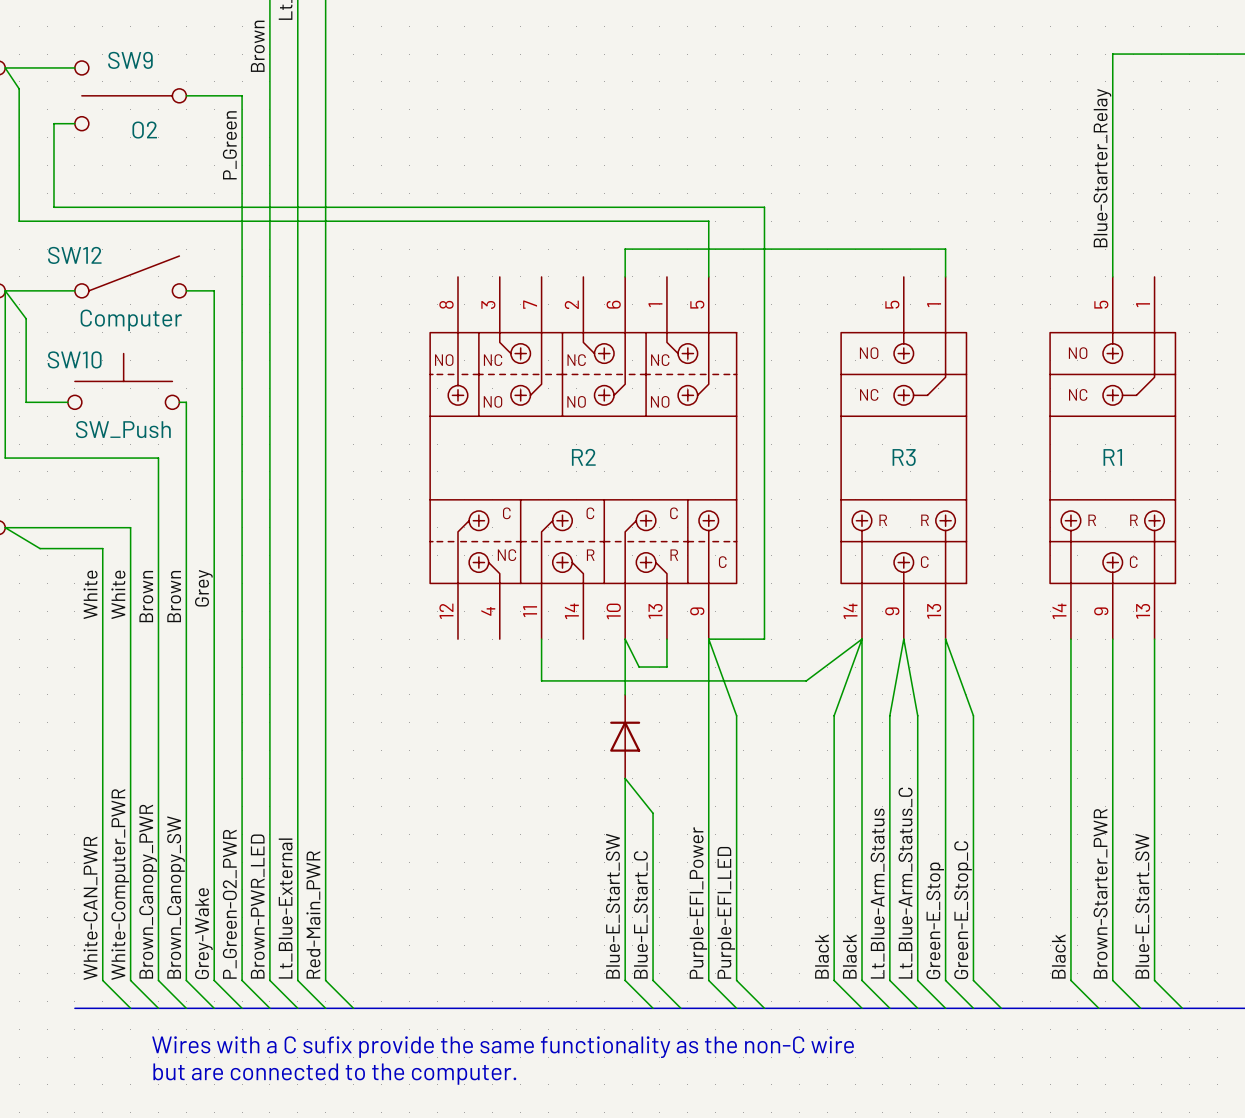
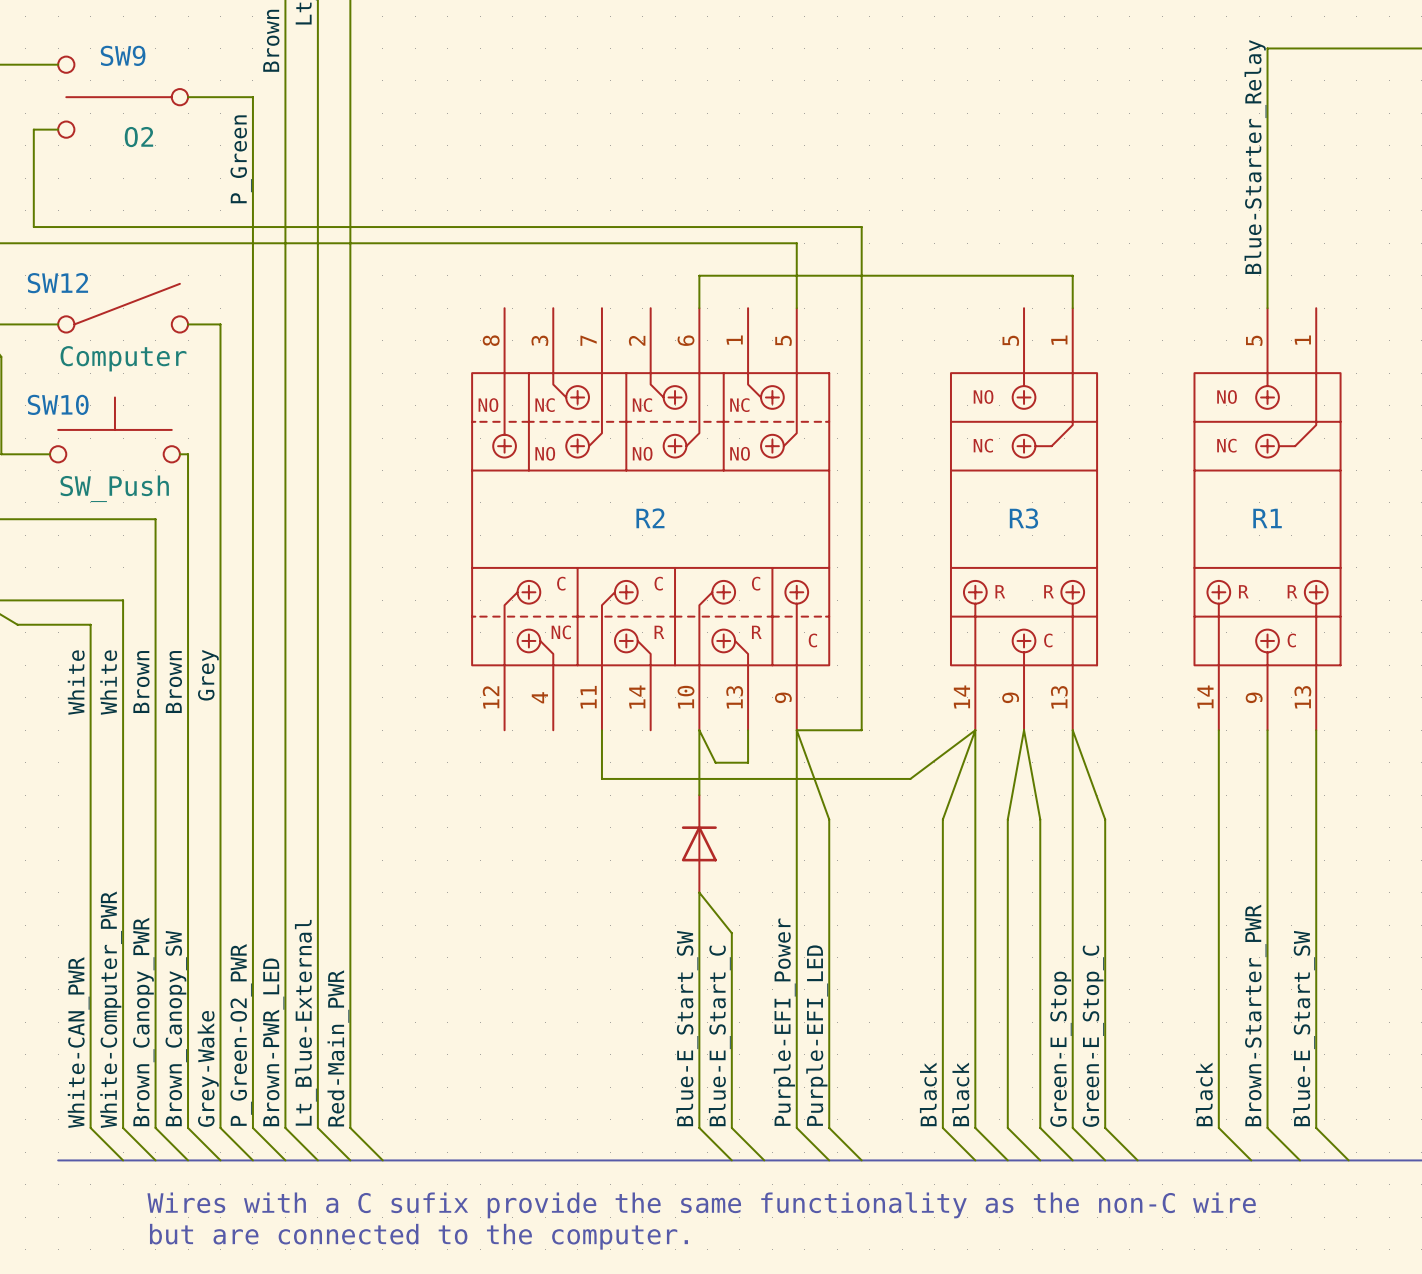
label: Lt_Blue-Arm_Status_C (905, 883) -> none
label: Lt_Blue-Arm_Status (877, 893) -> none

